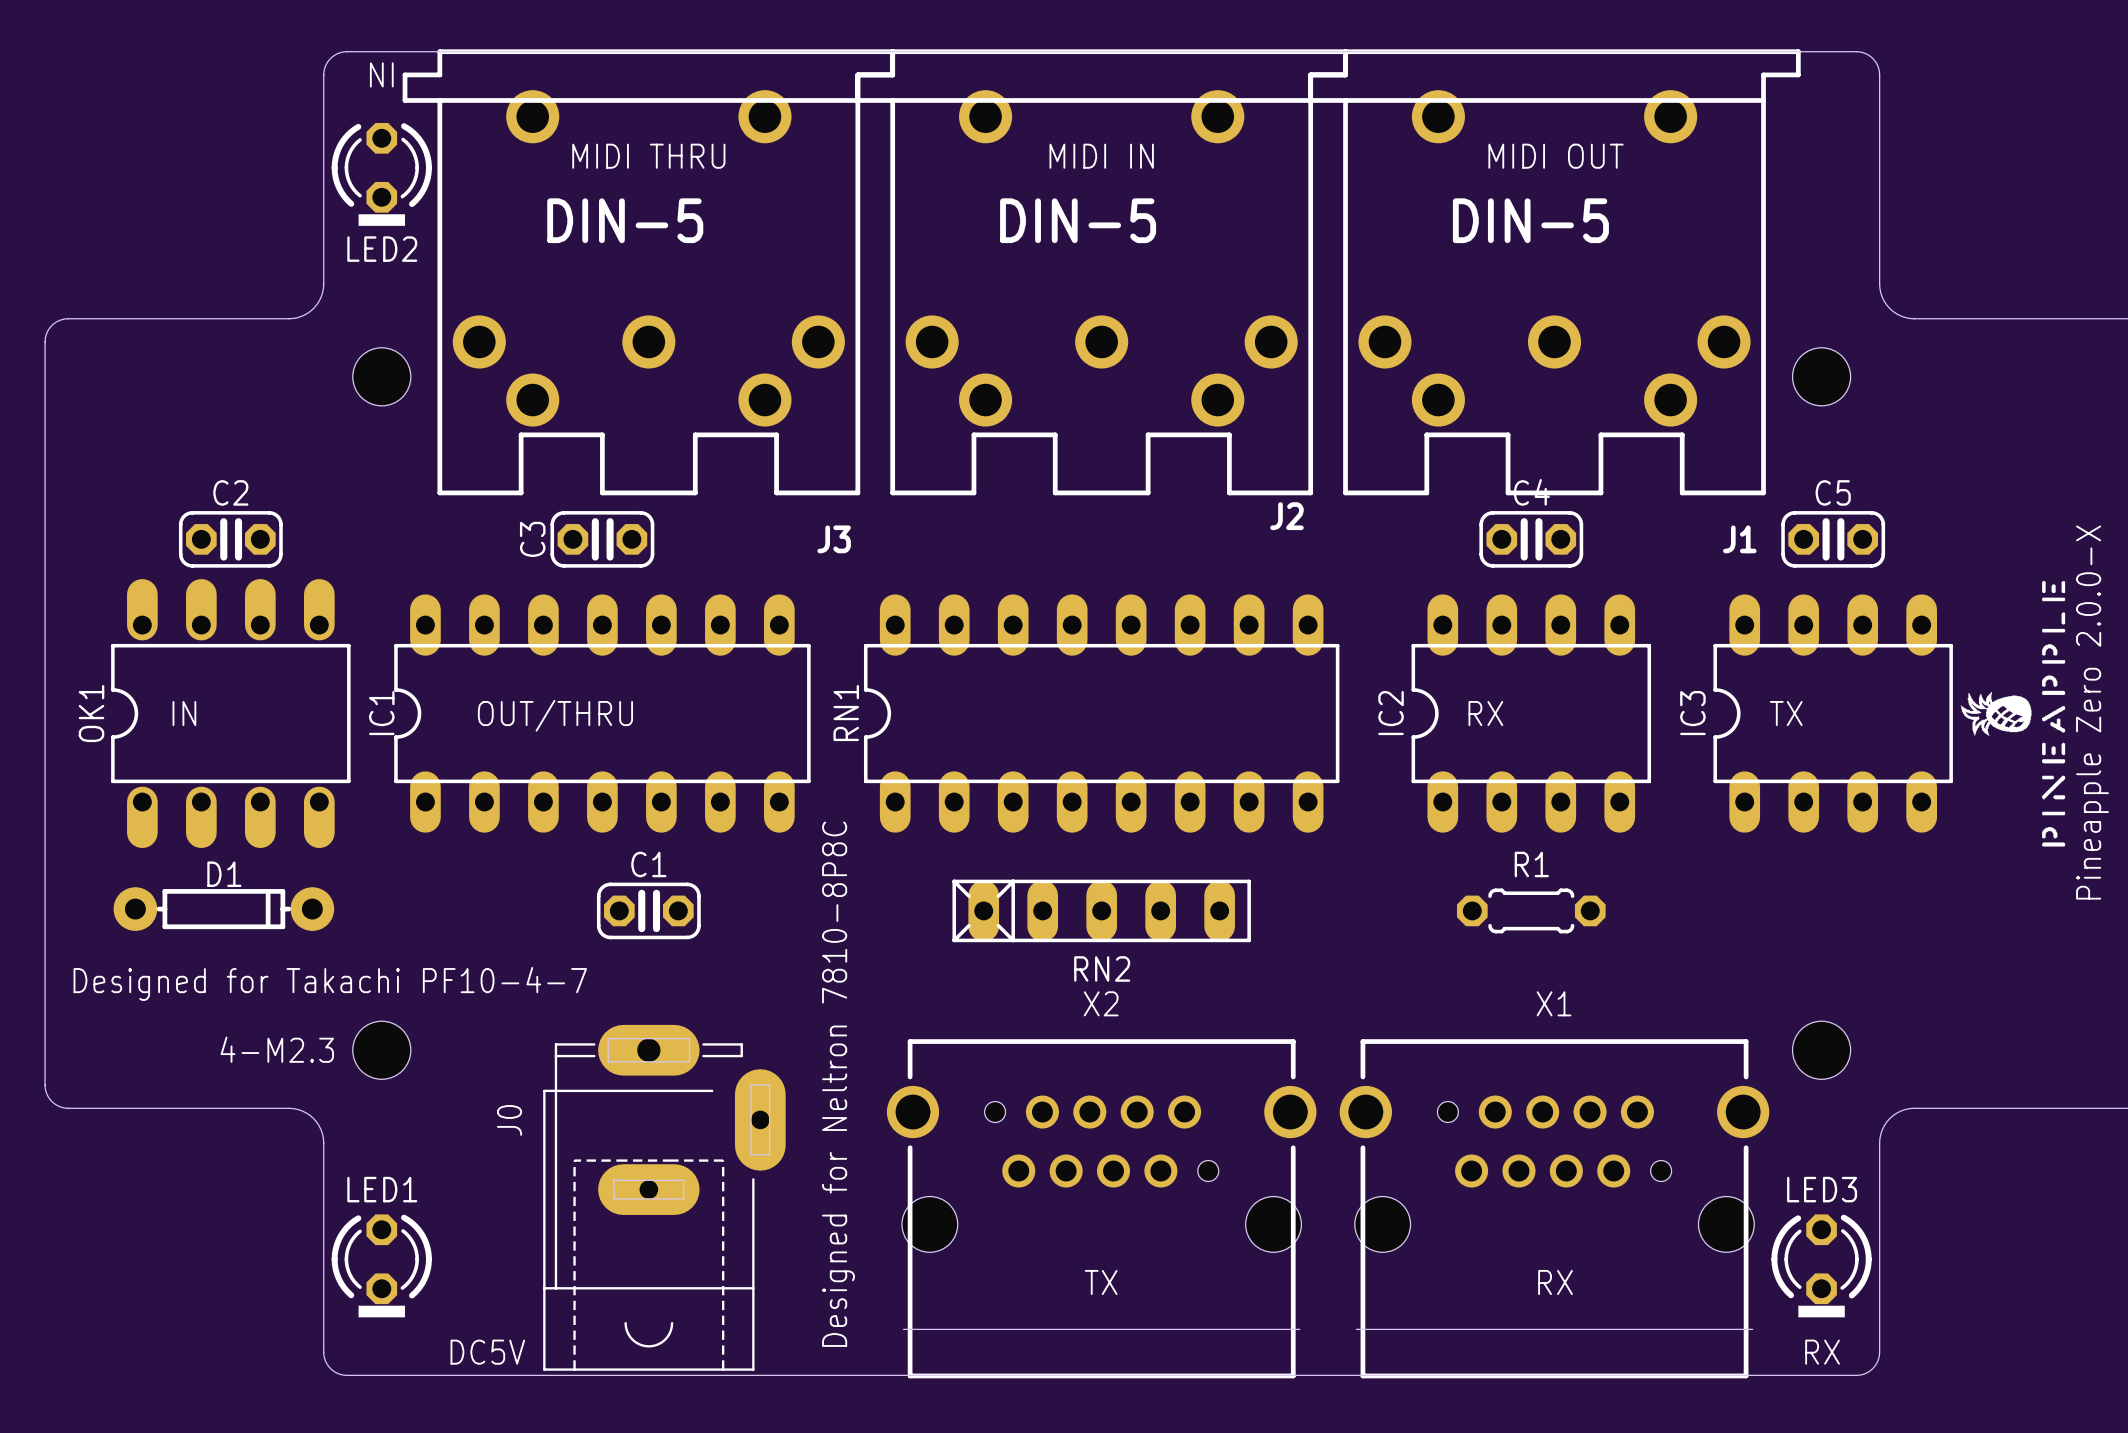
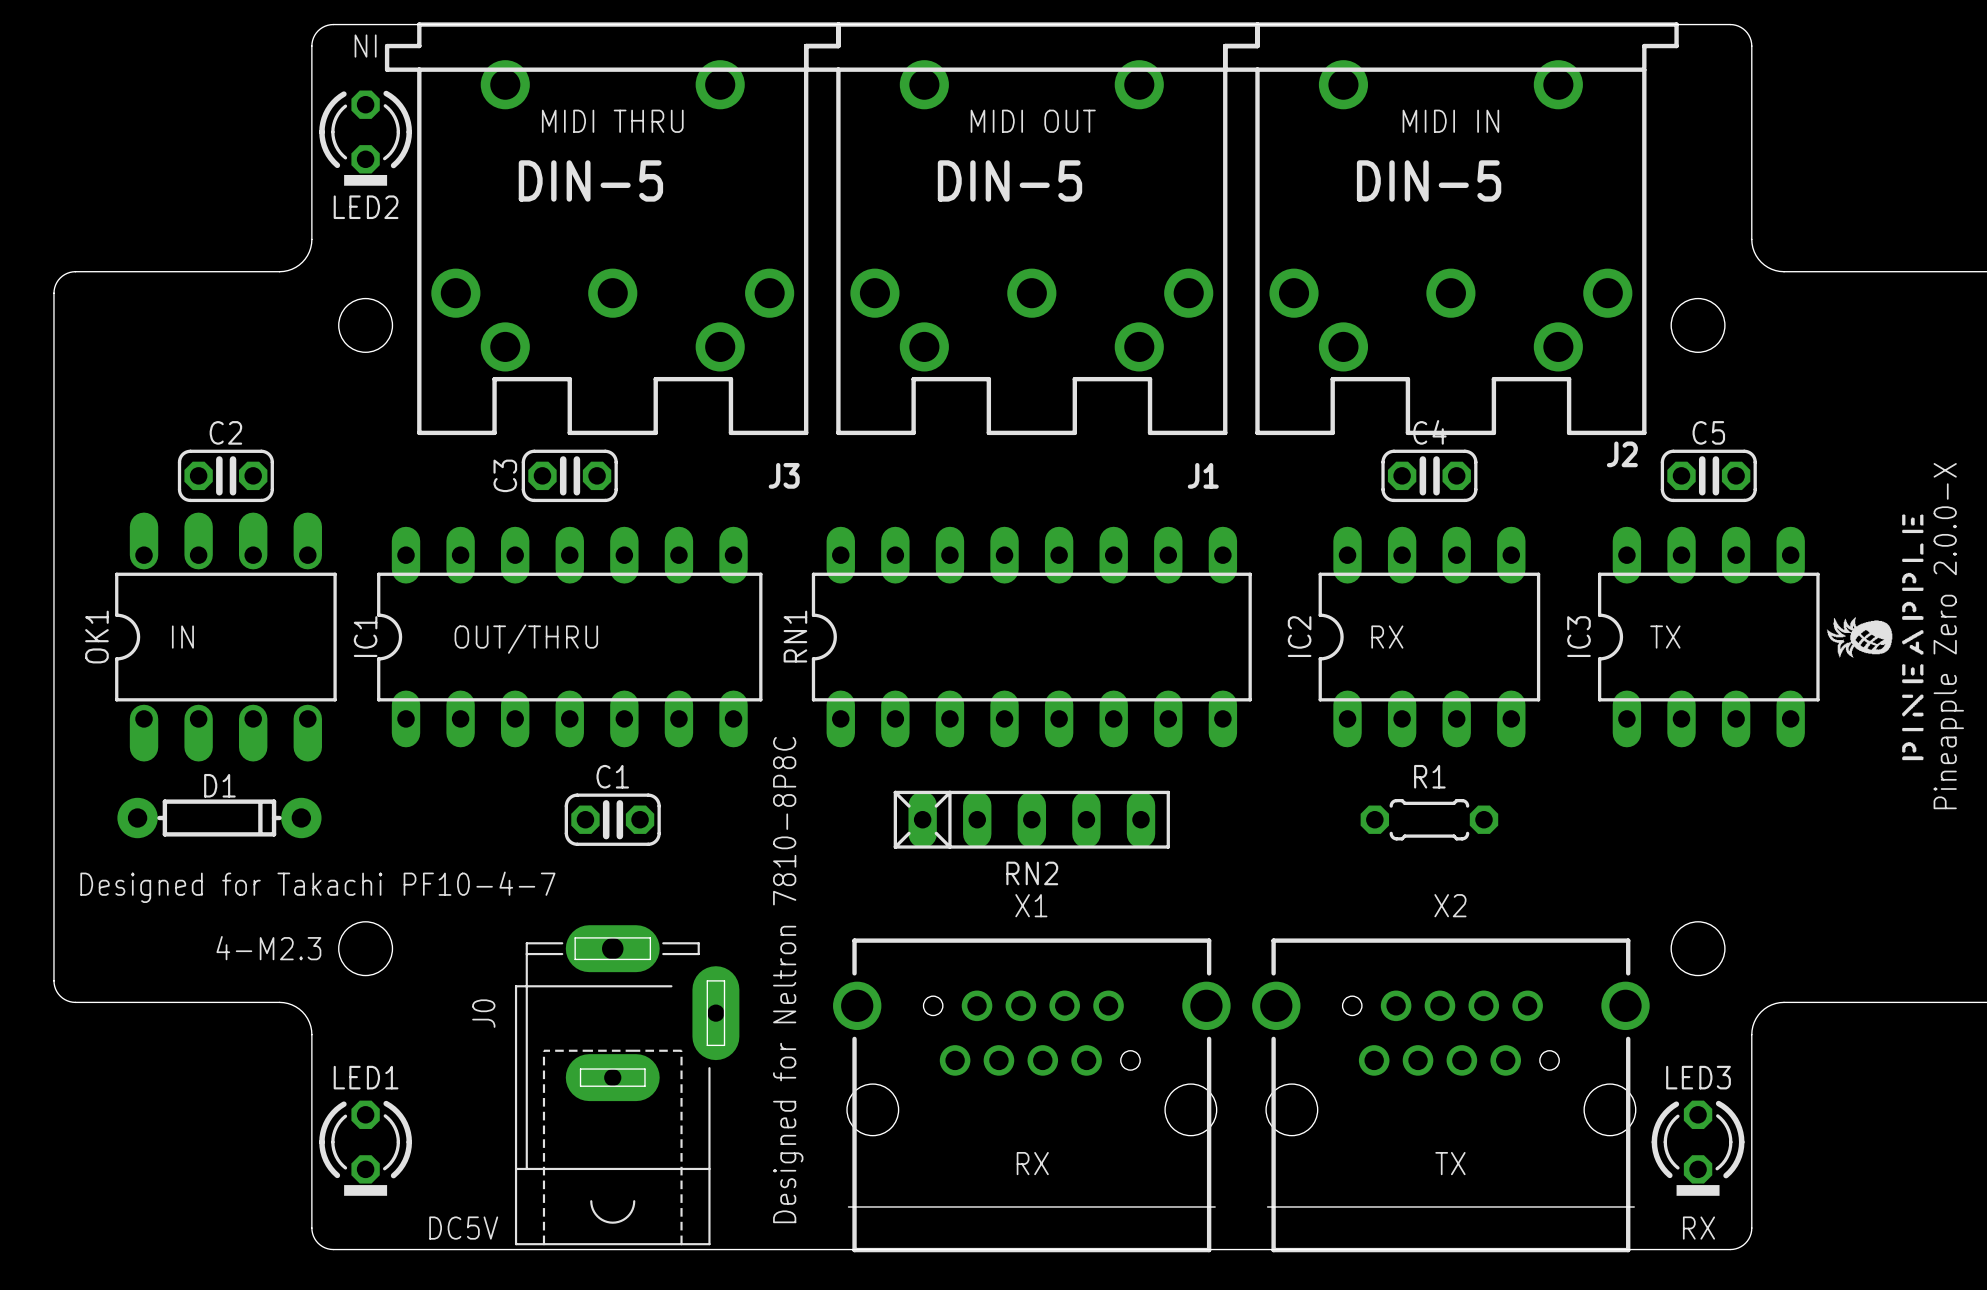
text: MIDI IN (1101, 156) -> MIDI OUT (1033, 121)
text: MIDI OUT (1556, 156) -> MIDI IN (1450, 121)
J2 name: J2 (1286, 516) -> J1 (1203, 475)
J1 name: J1 (1739, 539) -> J2 (1622, 454)
X2 name: X2 (1101, 1003) -> X1 (1031, 905)
X1 name: X1 (1554, 1003) -> X2 (1450, 905)
text: TX (1101, 1282) -> RX (1032, 1163)
text: RX (1555, 1282) -> TX (1450, 1163)

